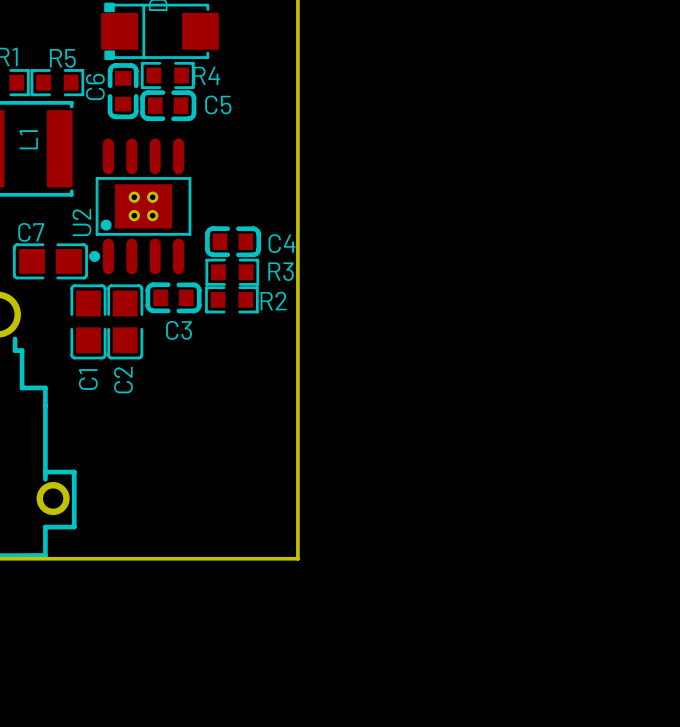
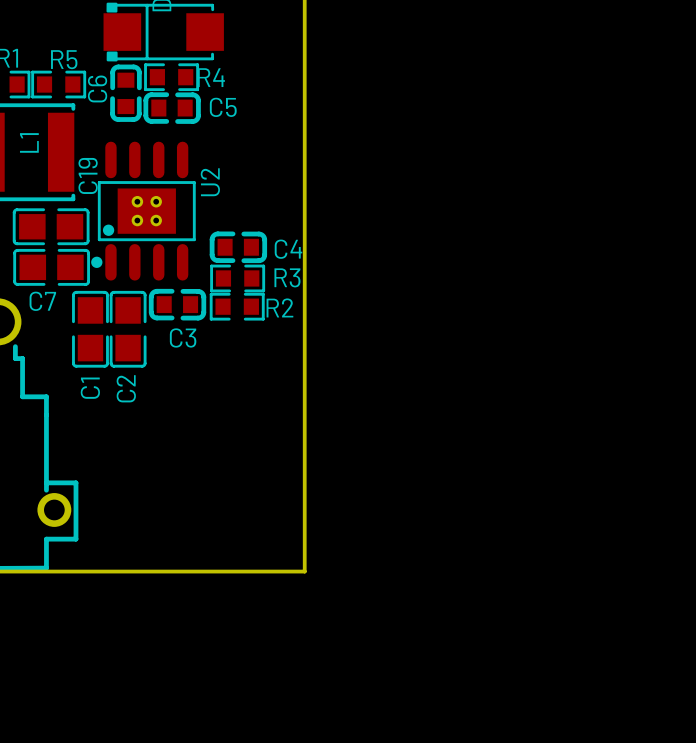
C19: none -> (51, 226)
U2 name position: U2 (81, 222) -> U2 (210, 182)
C7 name position: C7 (31, 232) -> C7 (42, 301)

